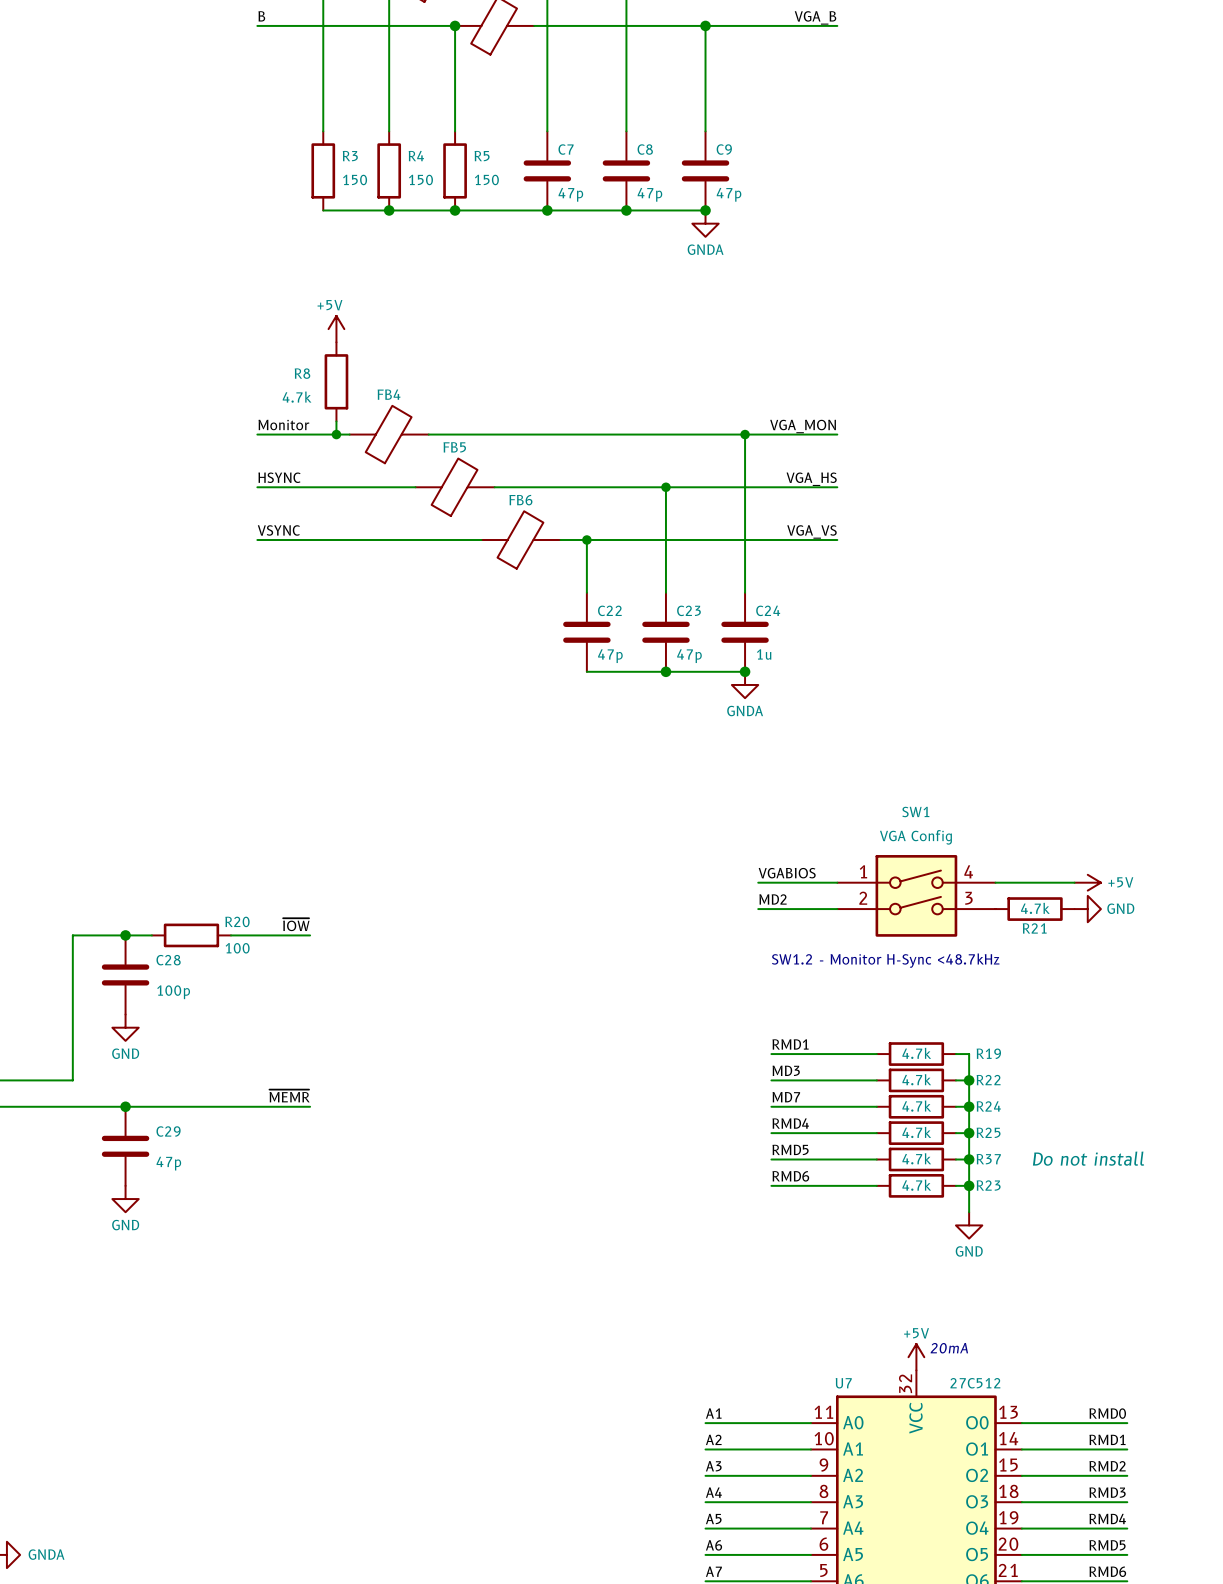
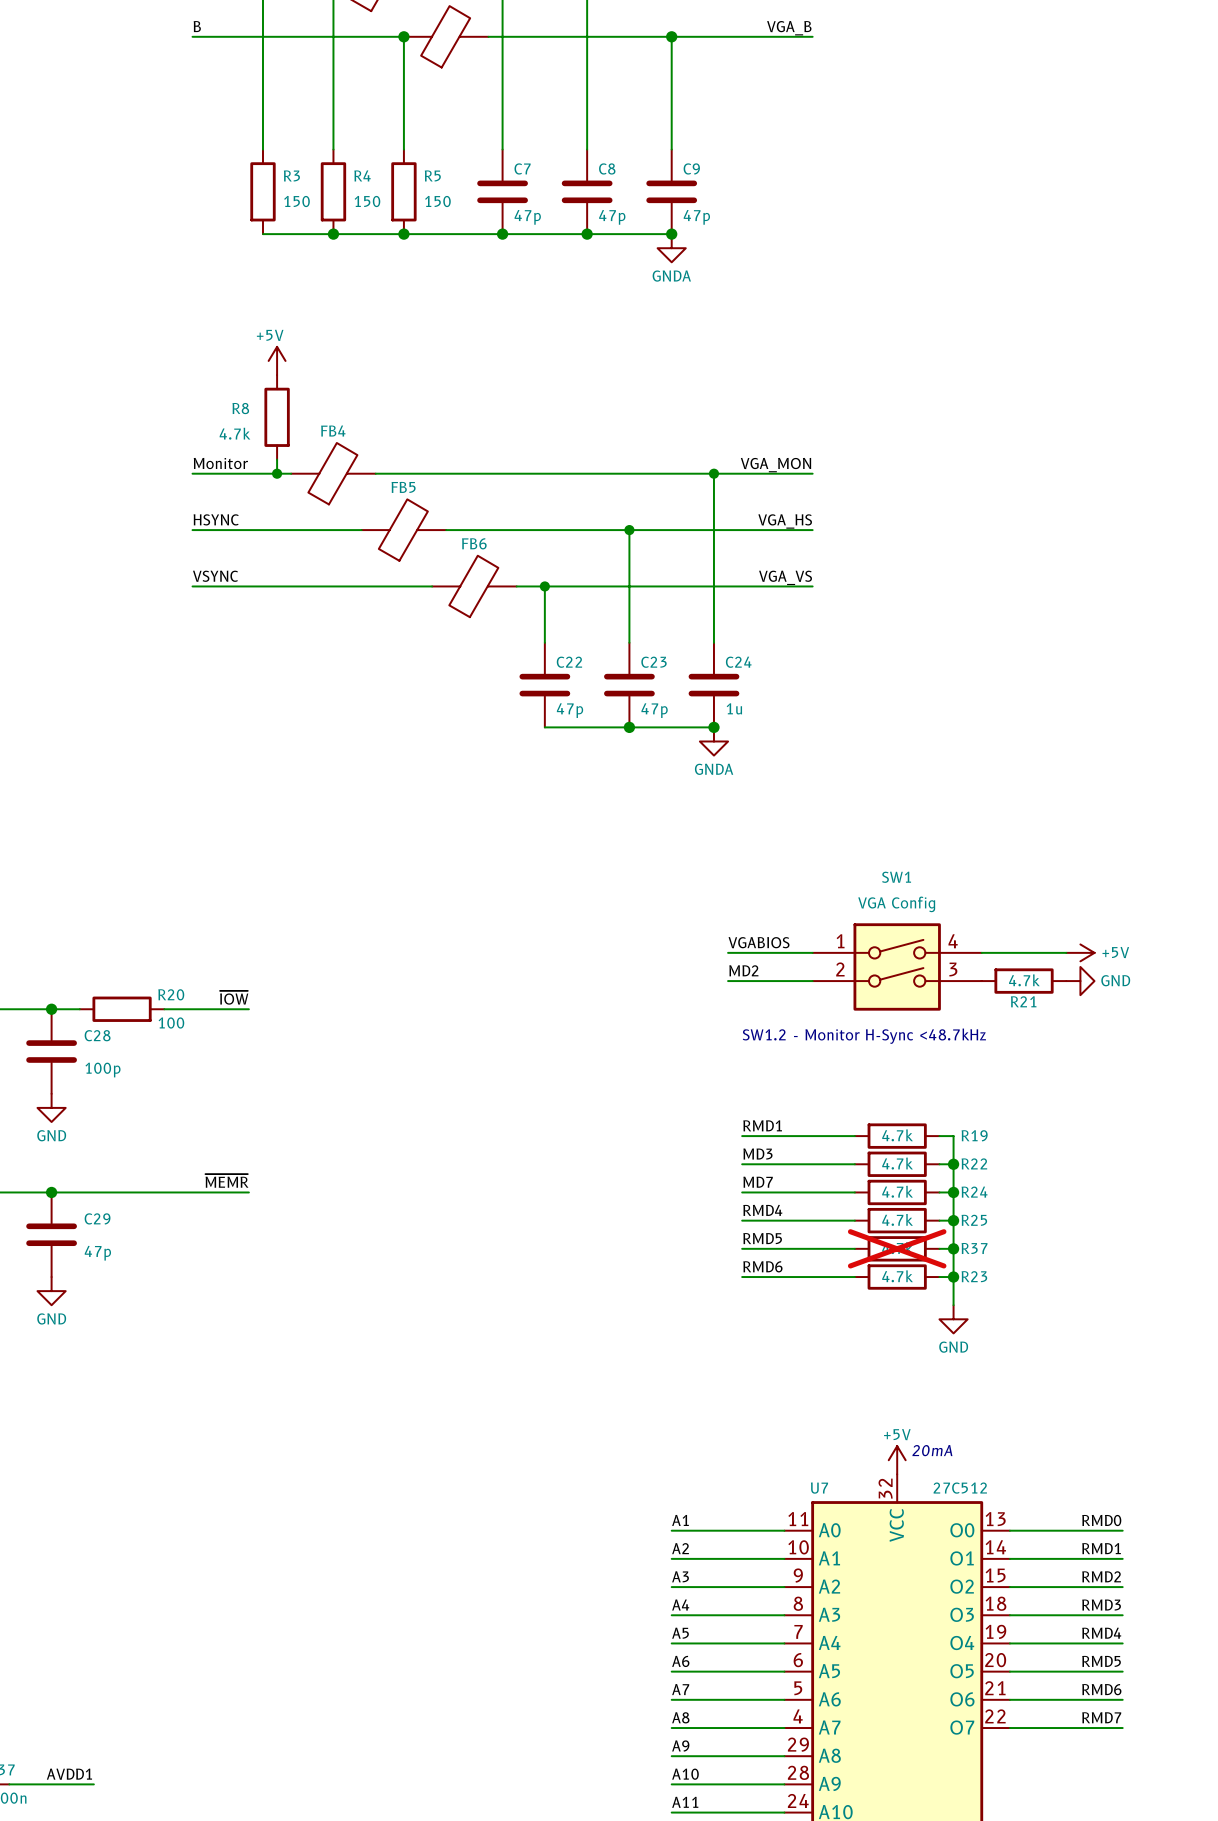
R37 text: Do not install (1088, 1158) -> none
R37 do-not-place cross: none -> (897, 1248)

